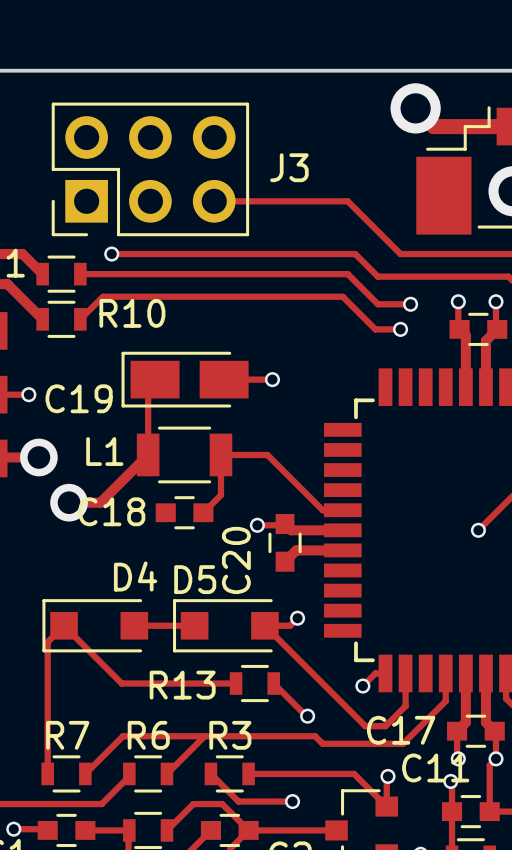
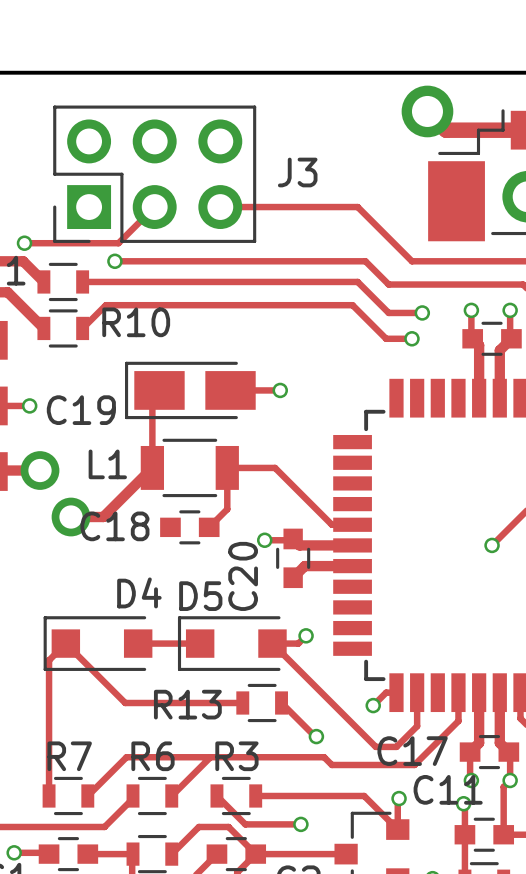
track: none -> (154, 207) (118, 243) (24, 243)
via: none -> (24, 243)

